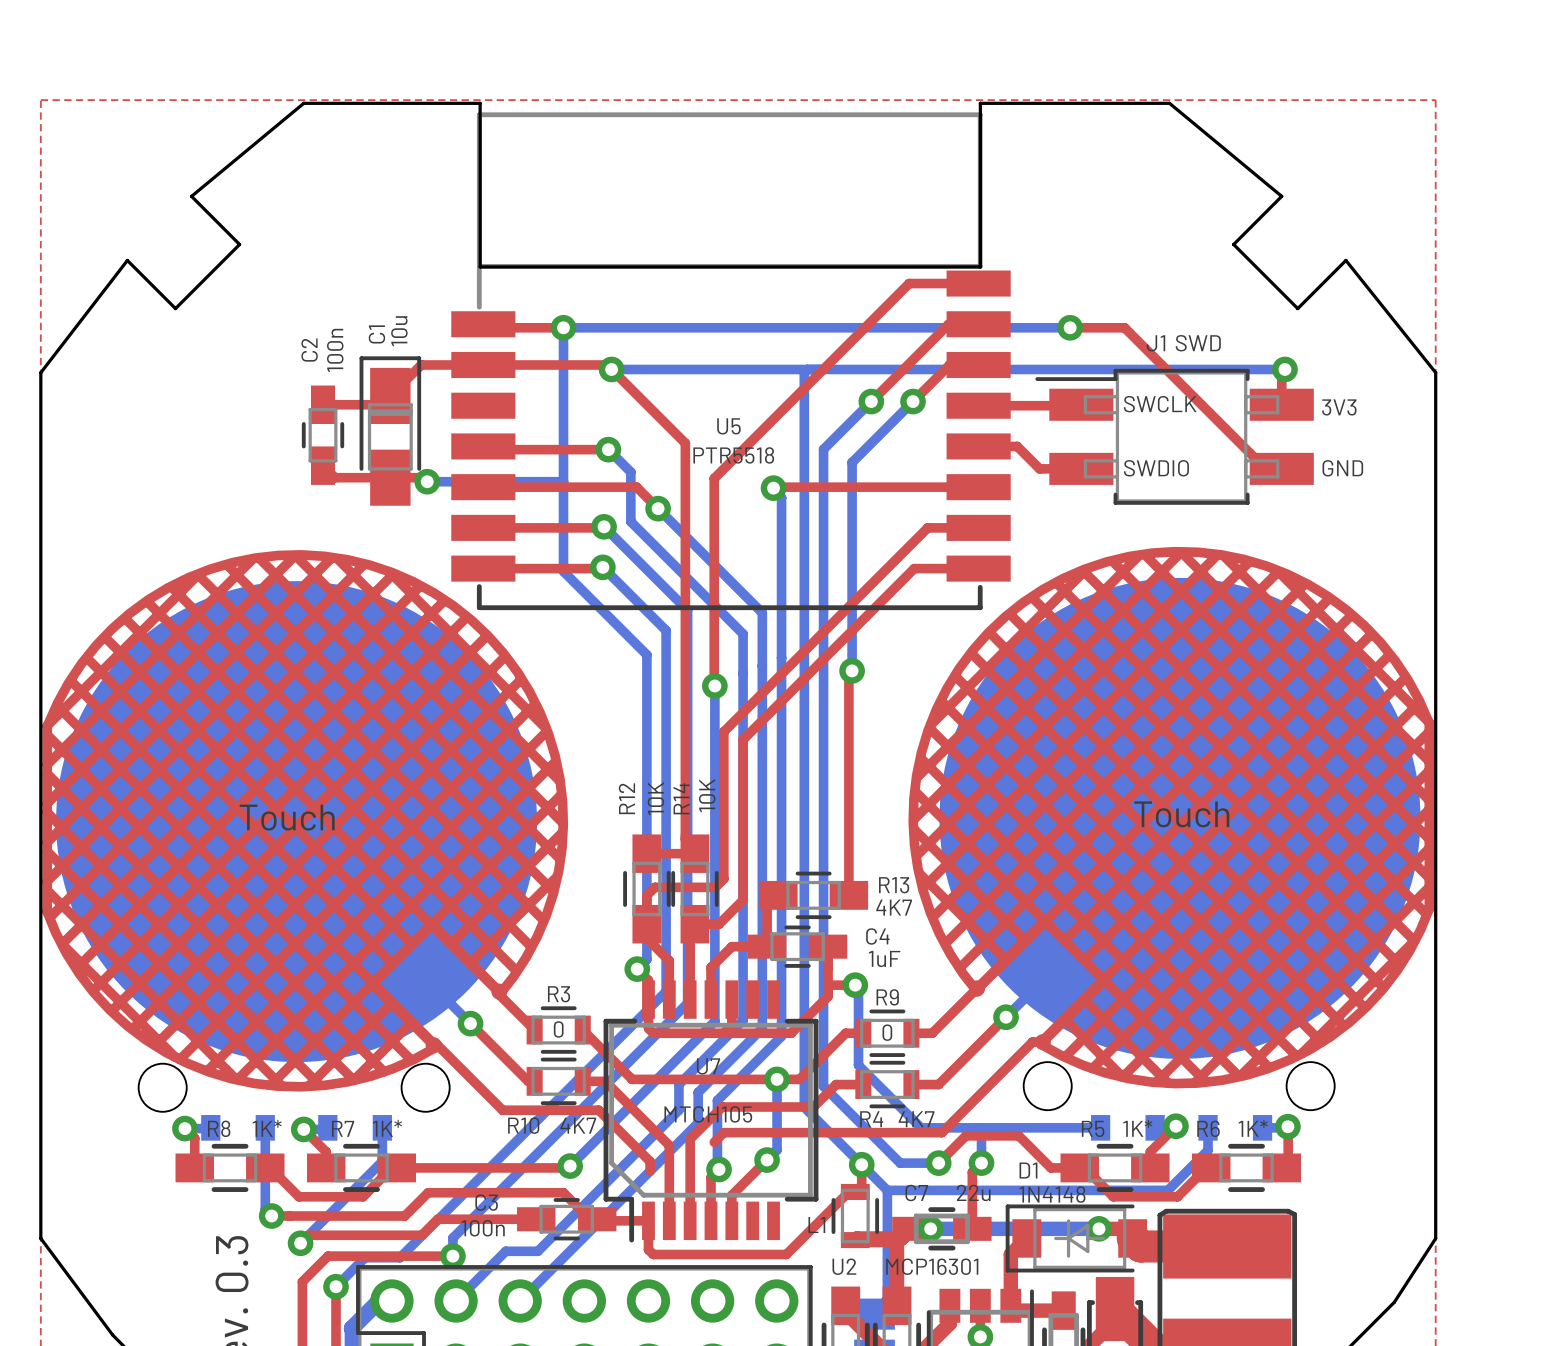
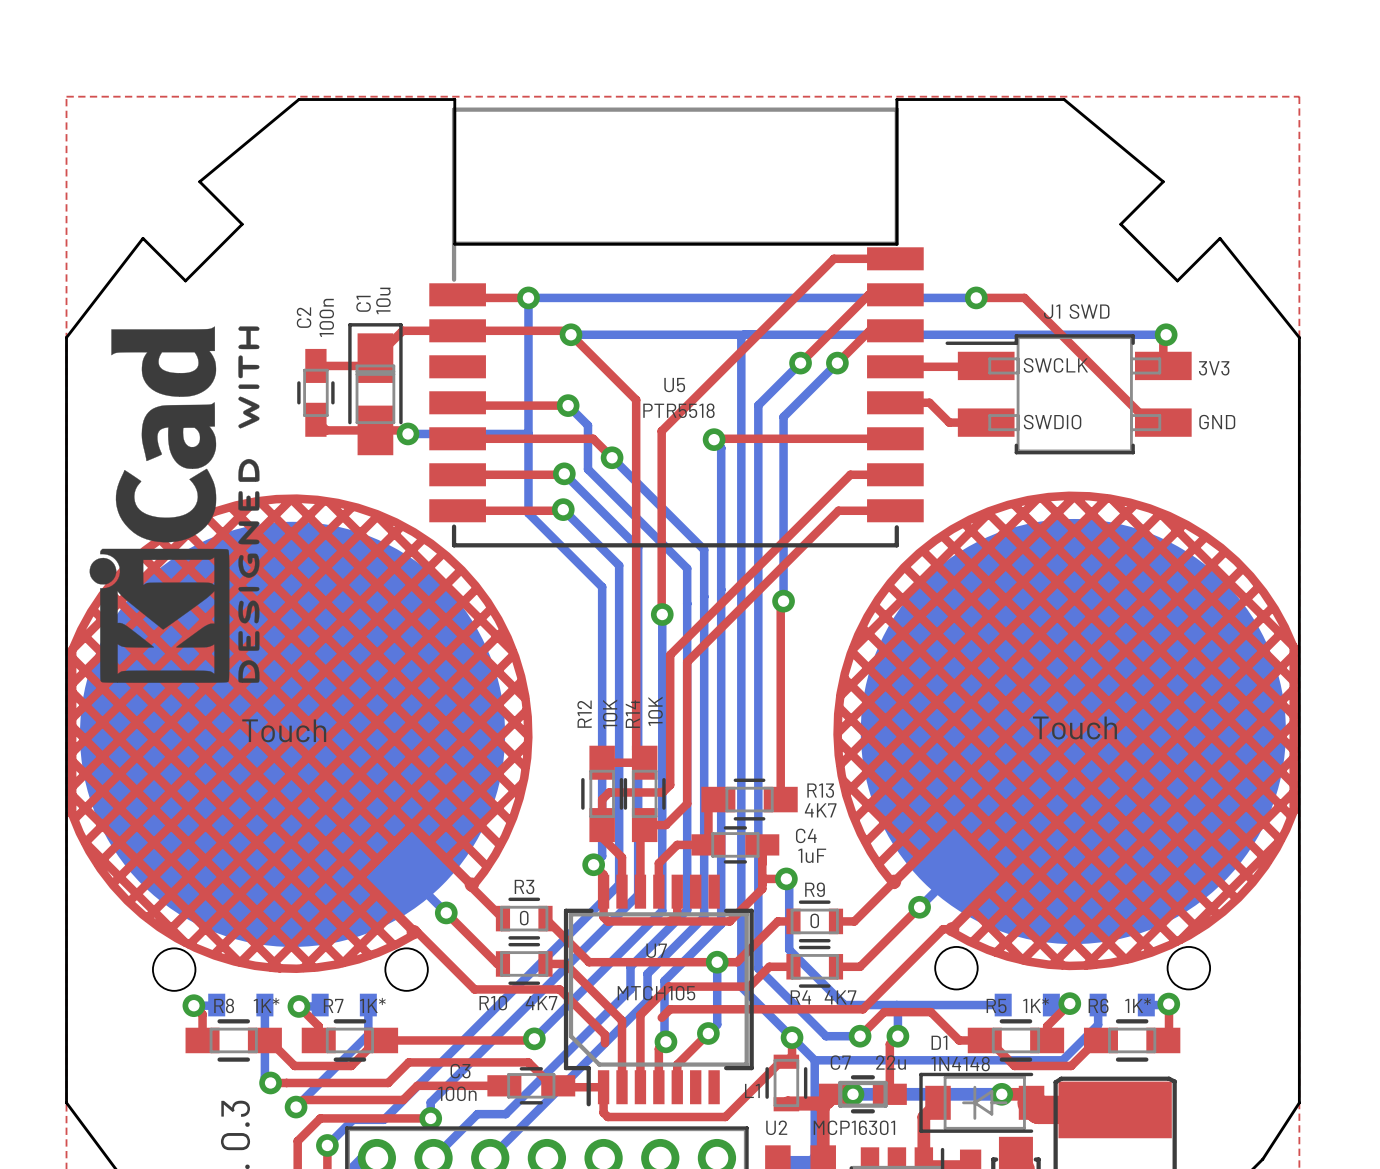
drawing: none -> [89, 326, 260, 683]

